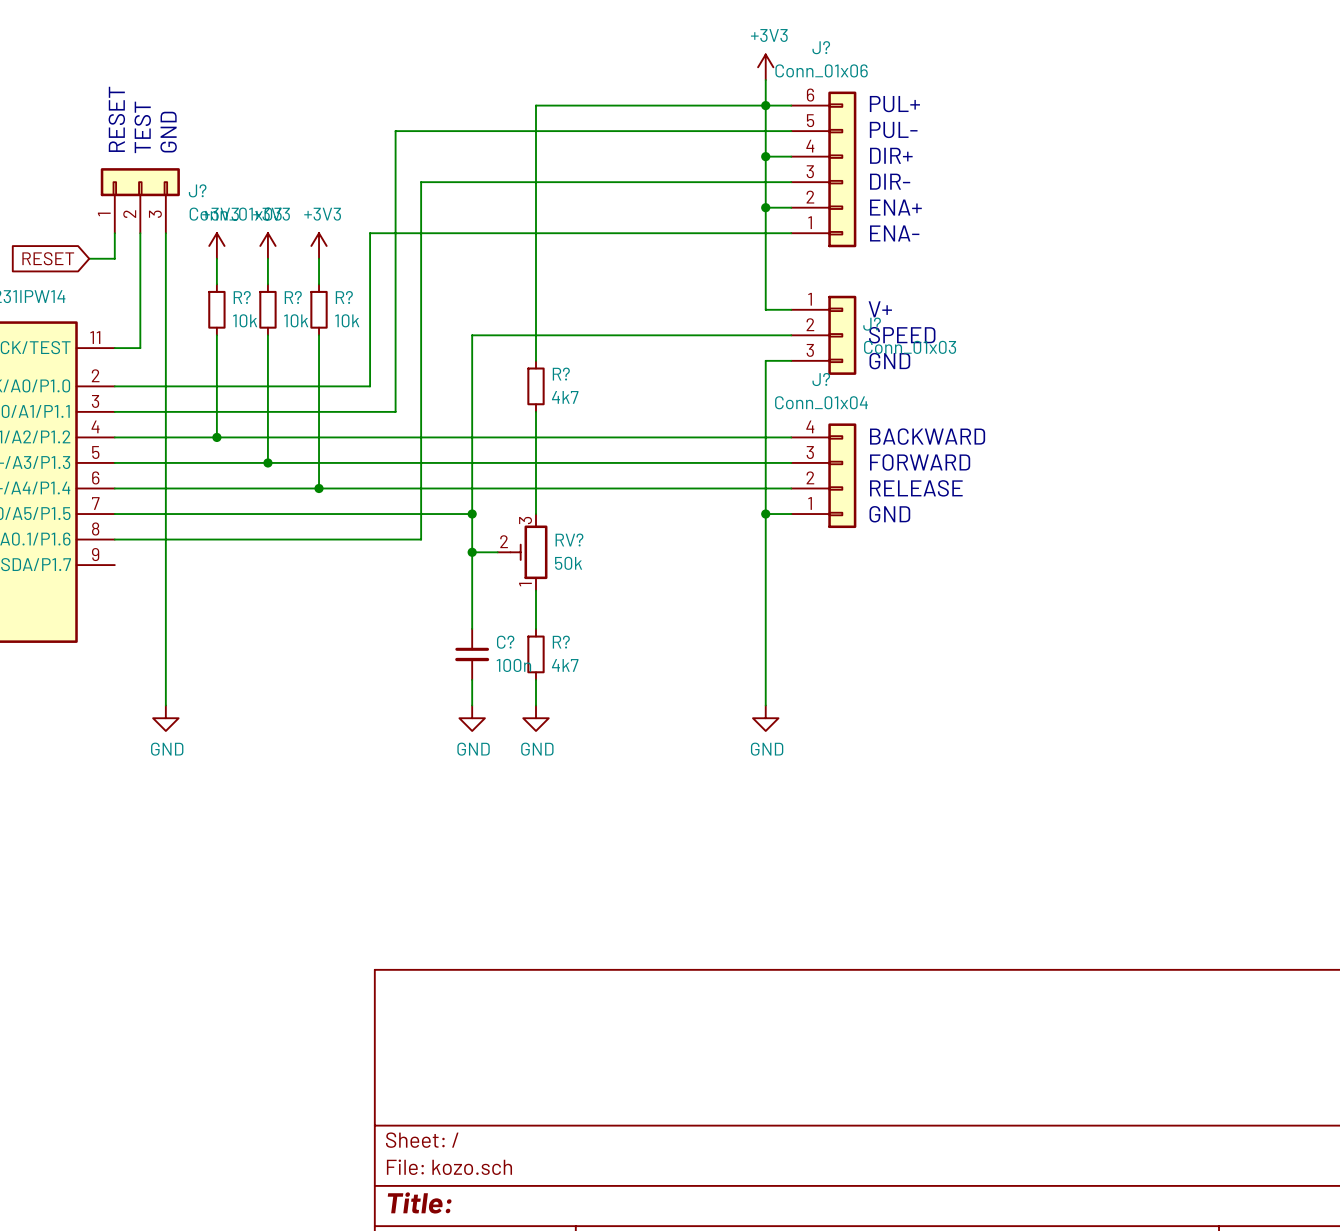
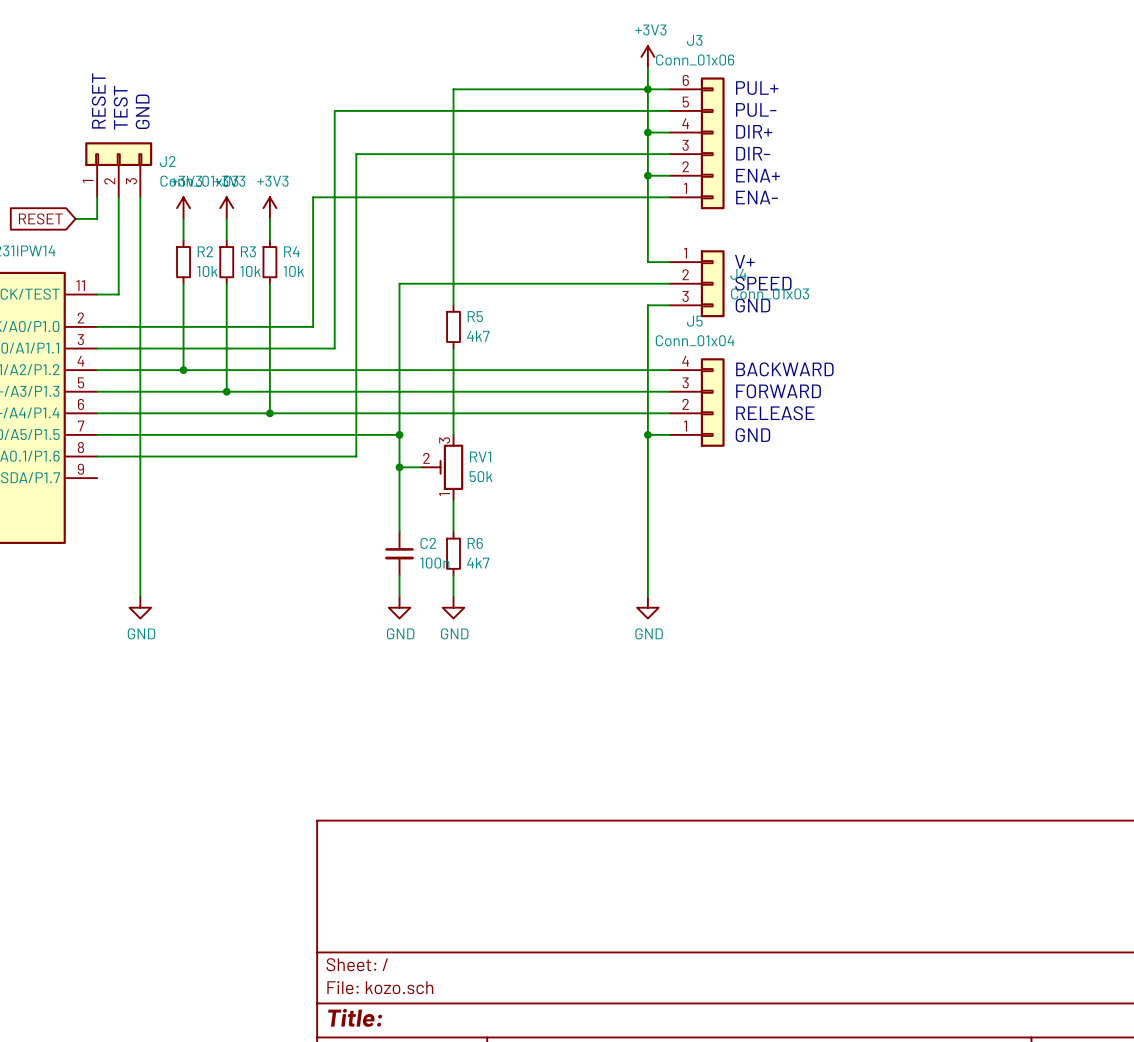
J? name: J? (821, 47) -> J3 (694, 40)
J? name: J? (197, 190) -> J2 (167, 161)
R? name: R? (242, 297) -> R2 (205, 251)
R? name: R? (293, 297) -> R3 (248, 251)
R? name: R? (344, 297) -> R4 (291, 251)
J? name: J? (872, 324) -> J4 (738, 274)
R? name: R? (561, 374) -> R5 (475, 316)
J? name: J? (821, 379) -> J5 (694, 321)
RV? name: RV? (569, 540) -> RV1 (480, 456)
C? name: C? (505, 642) -> C2 (428, 543)
R? name: R? (561, 642) -> R6 (475, 543)

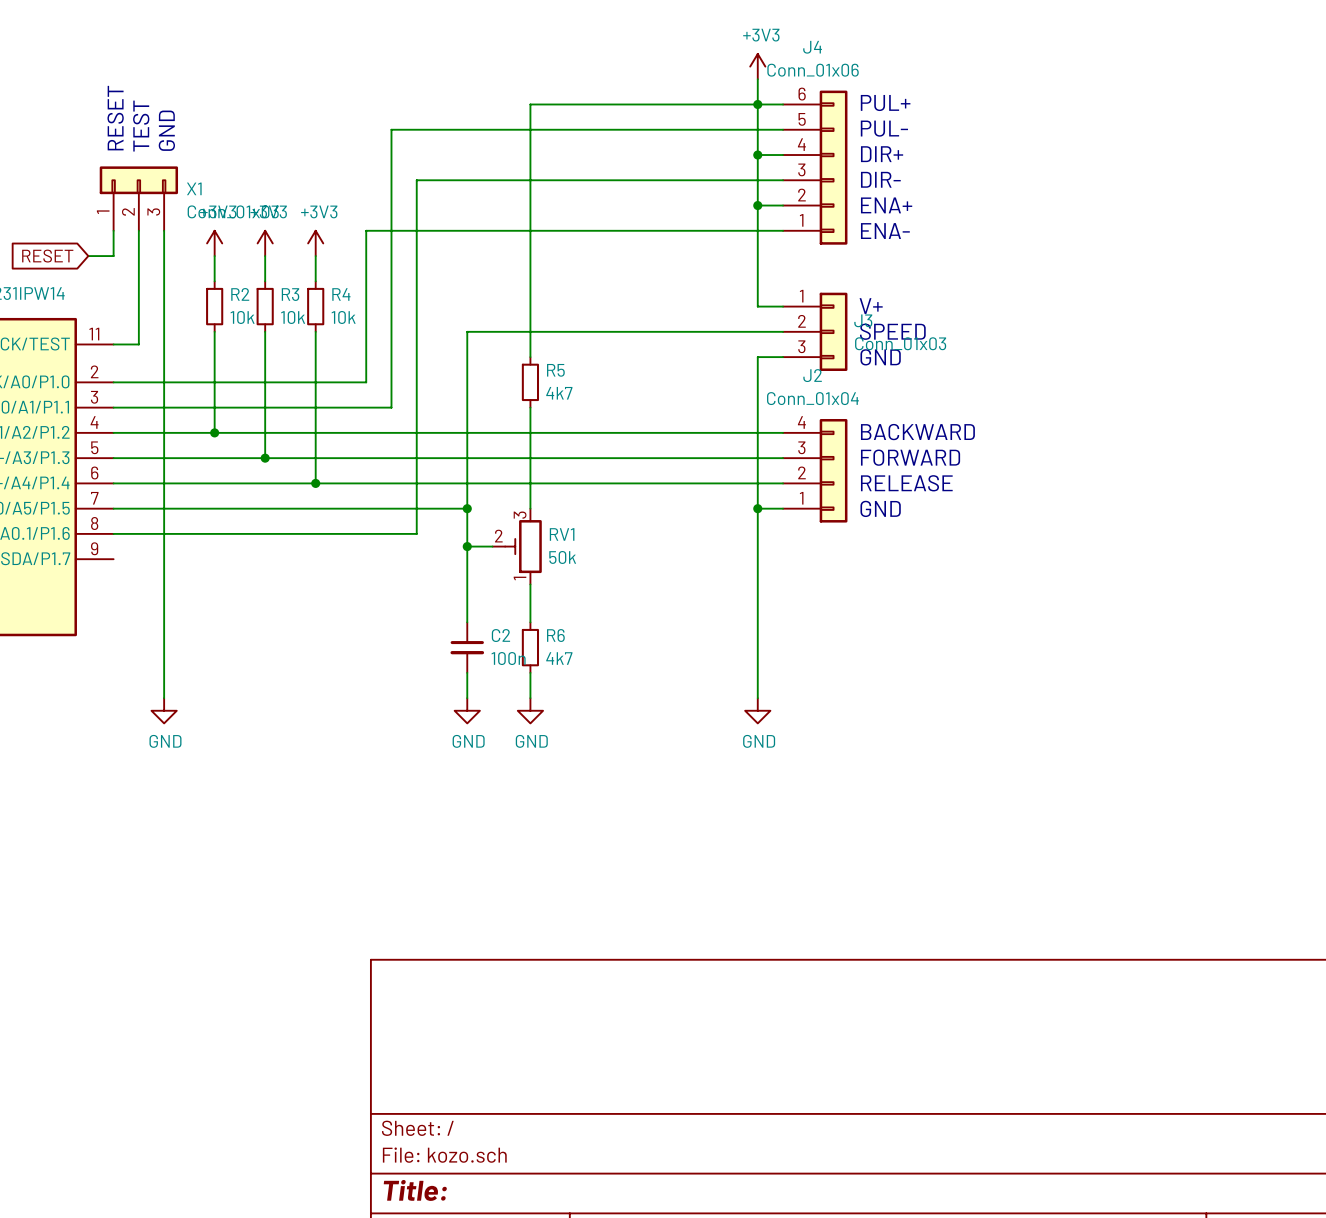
J3 name: J3 (694, 40) -> J4 (812, 47)
J2 name: J2 (167, 161) -> X1 (194, 188)
J4 name: J4 (738, 274) -> J3 (863, 320)
J5 name: J5 (694, 321) -> J2 (812, 375)

